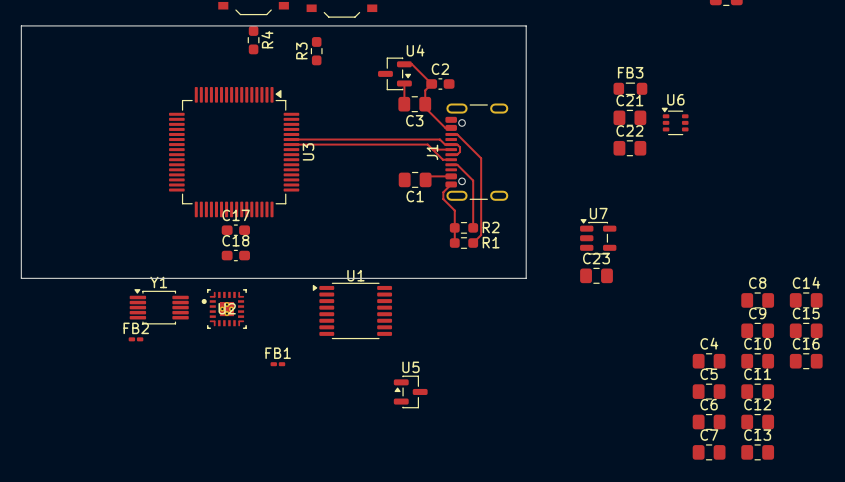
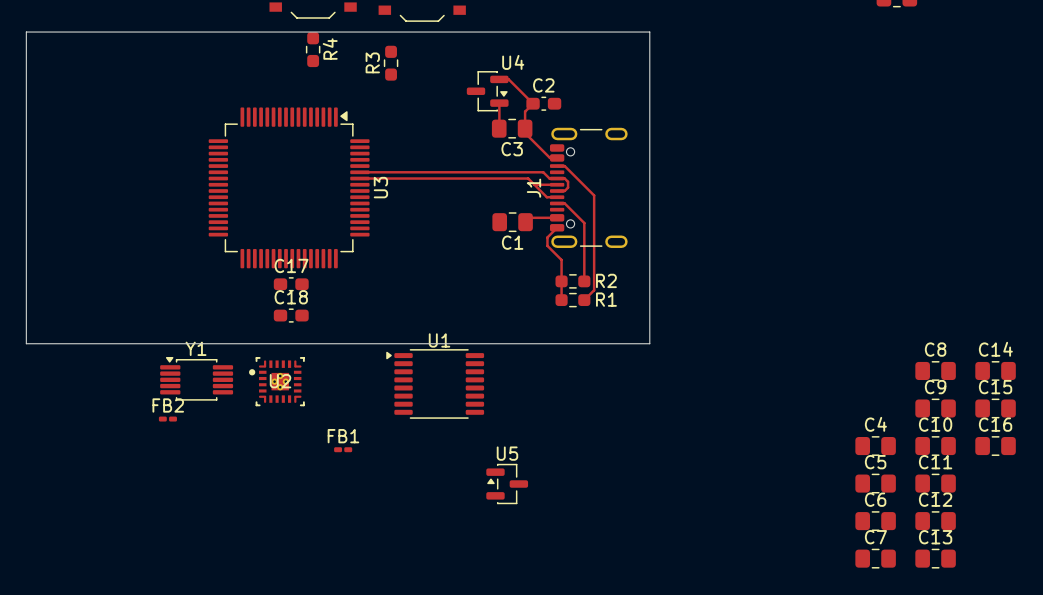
FB3: (630, 88) -> none
C21: (629, 117) -> none
U6: (675, 121) -> none
C22: (629, 148) -> none
U7: (598, 236) -> none
C23: (596, 275) -> none

